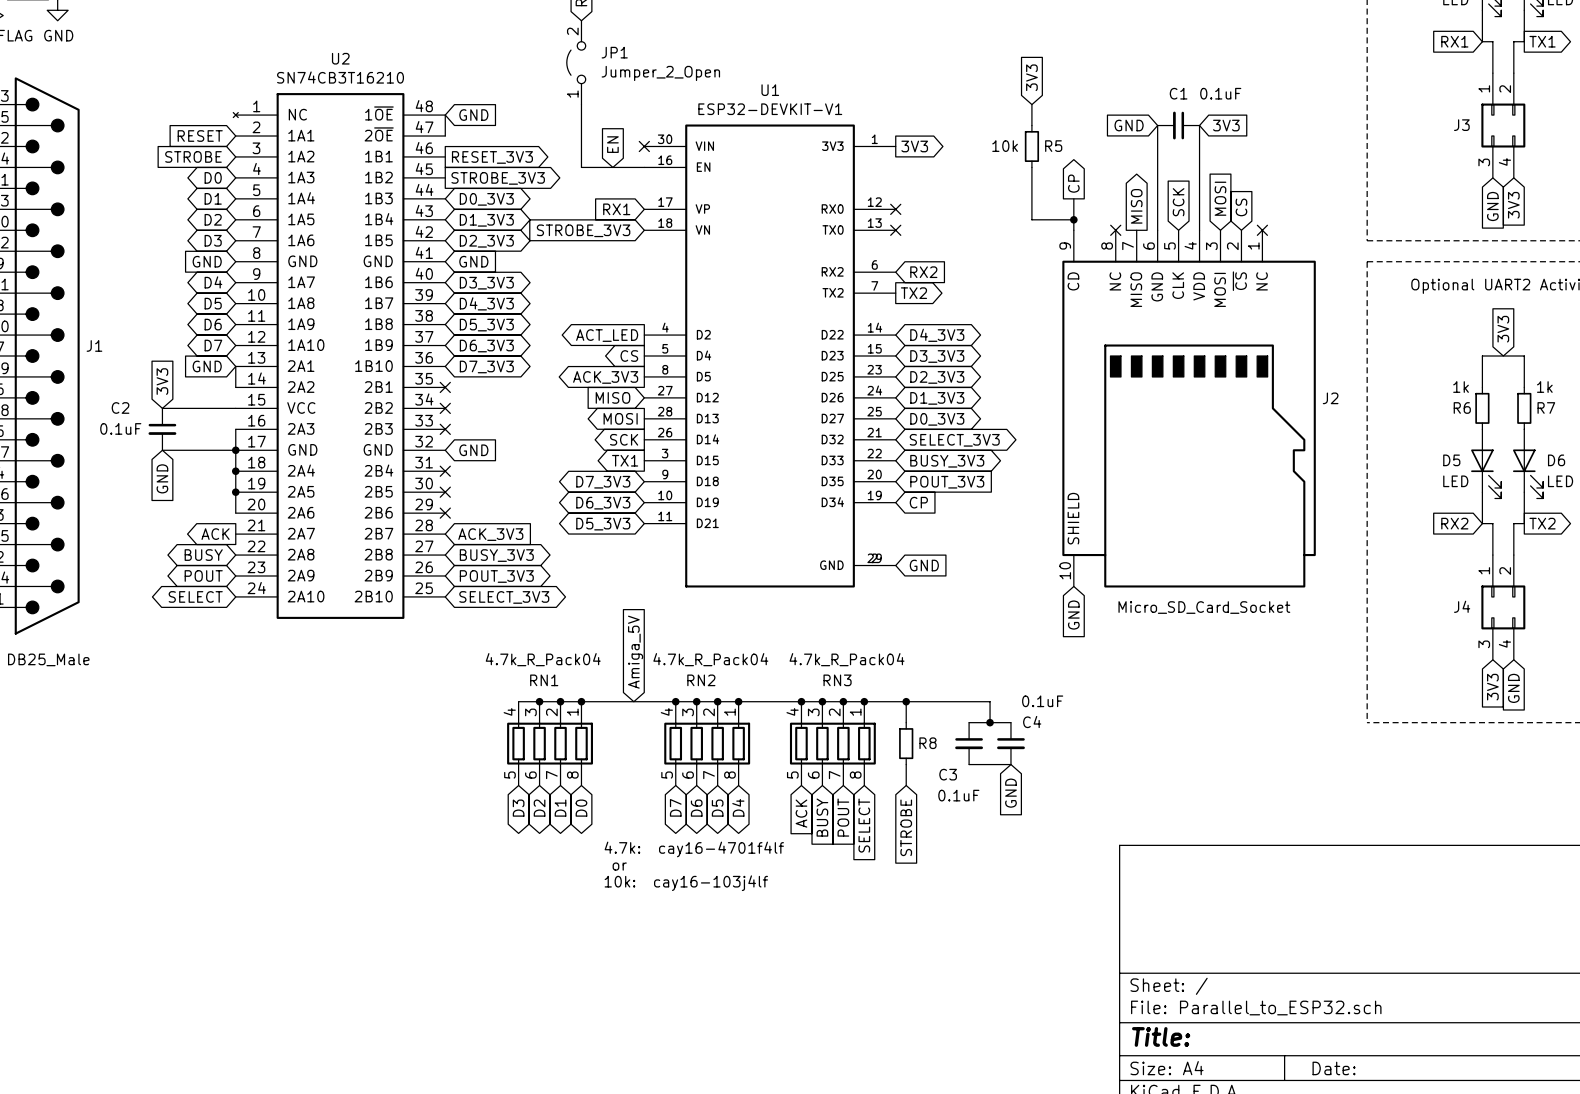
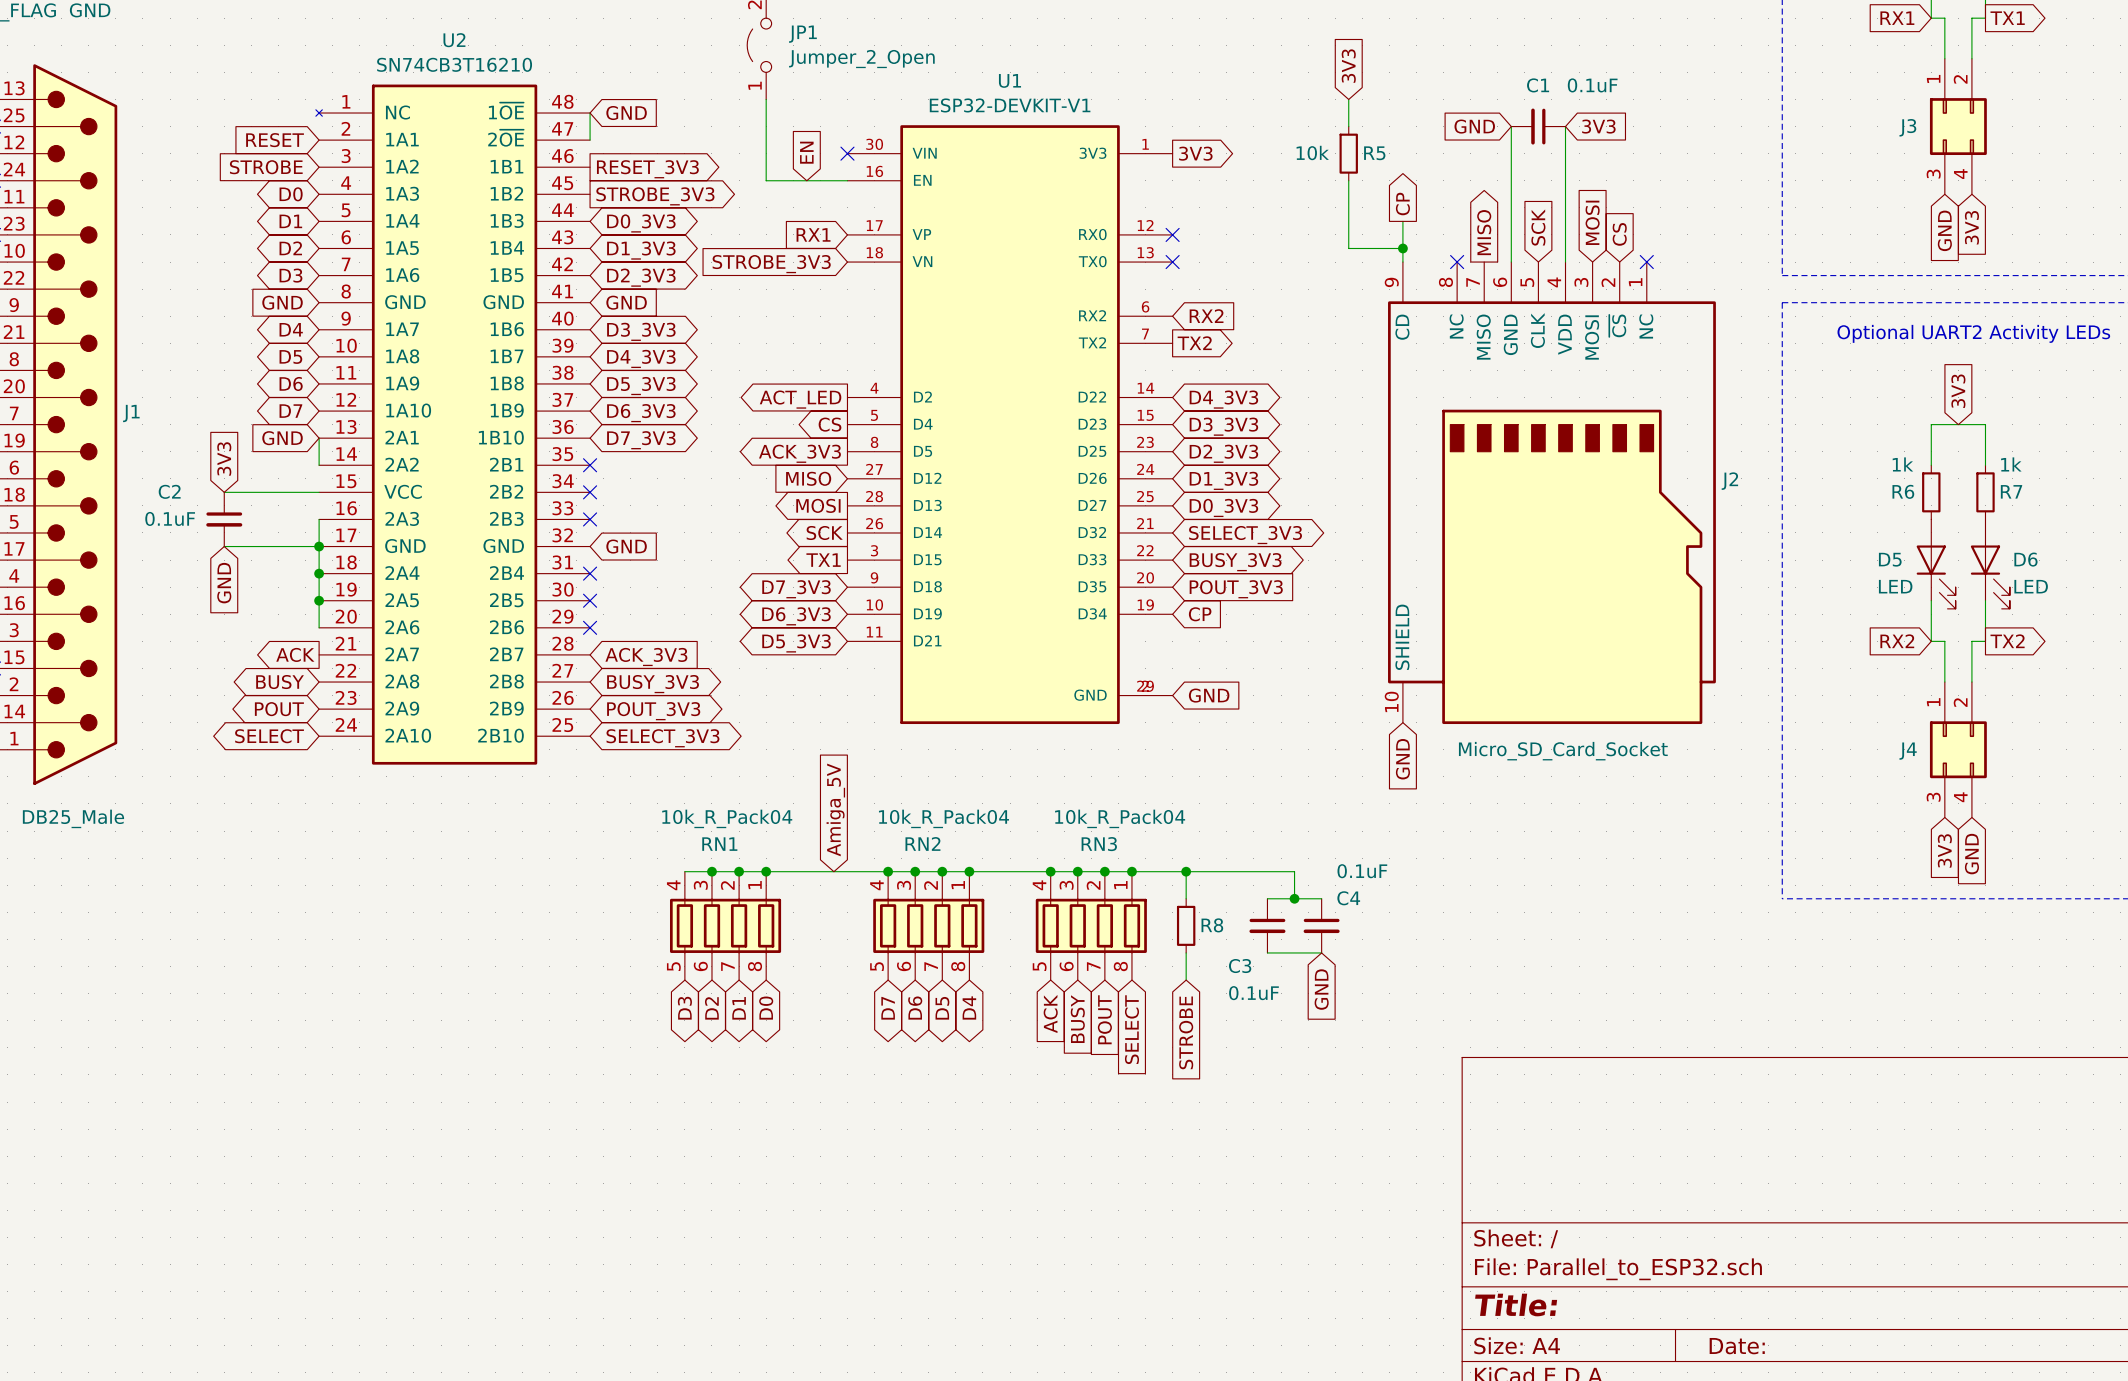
RN1 value: 4.7k_R_Pack04 (543, 659) -> 10k_R_Pack04 (727, 818)
RN2 value: 4.7k_R_Pack04 (710, 659) -> 10k_R_Pack04 (943, 818)
RN3 value: 4.7k_R_Pack04 (847, 659) -> 10k_R_Pack04 (1120, 818)
text: 4.7k: cay16-4701f4lf (694, 849) -> none
text: or (619, 866) -> none
text: 10k: cay16-103j4lf (686, 883) -> none

